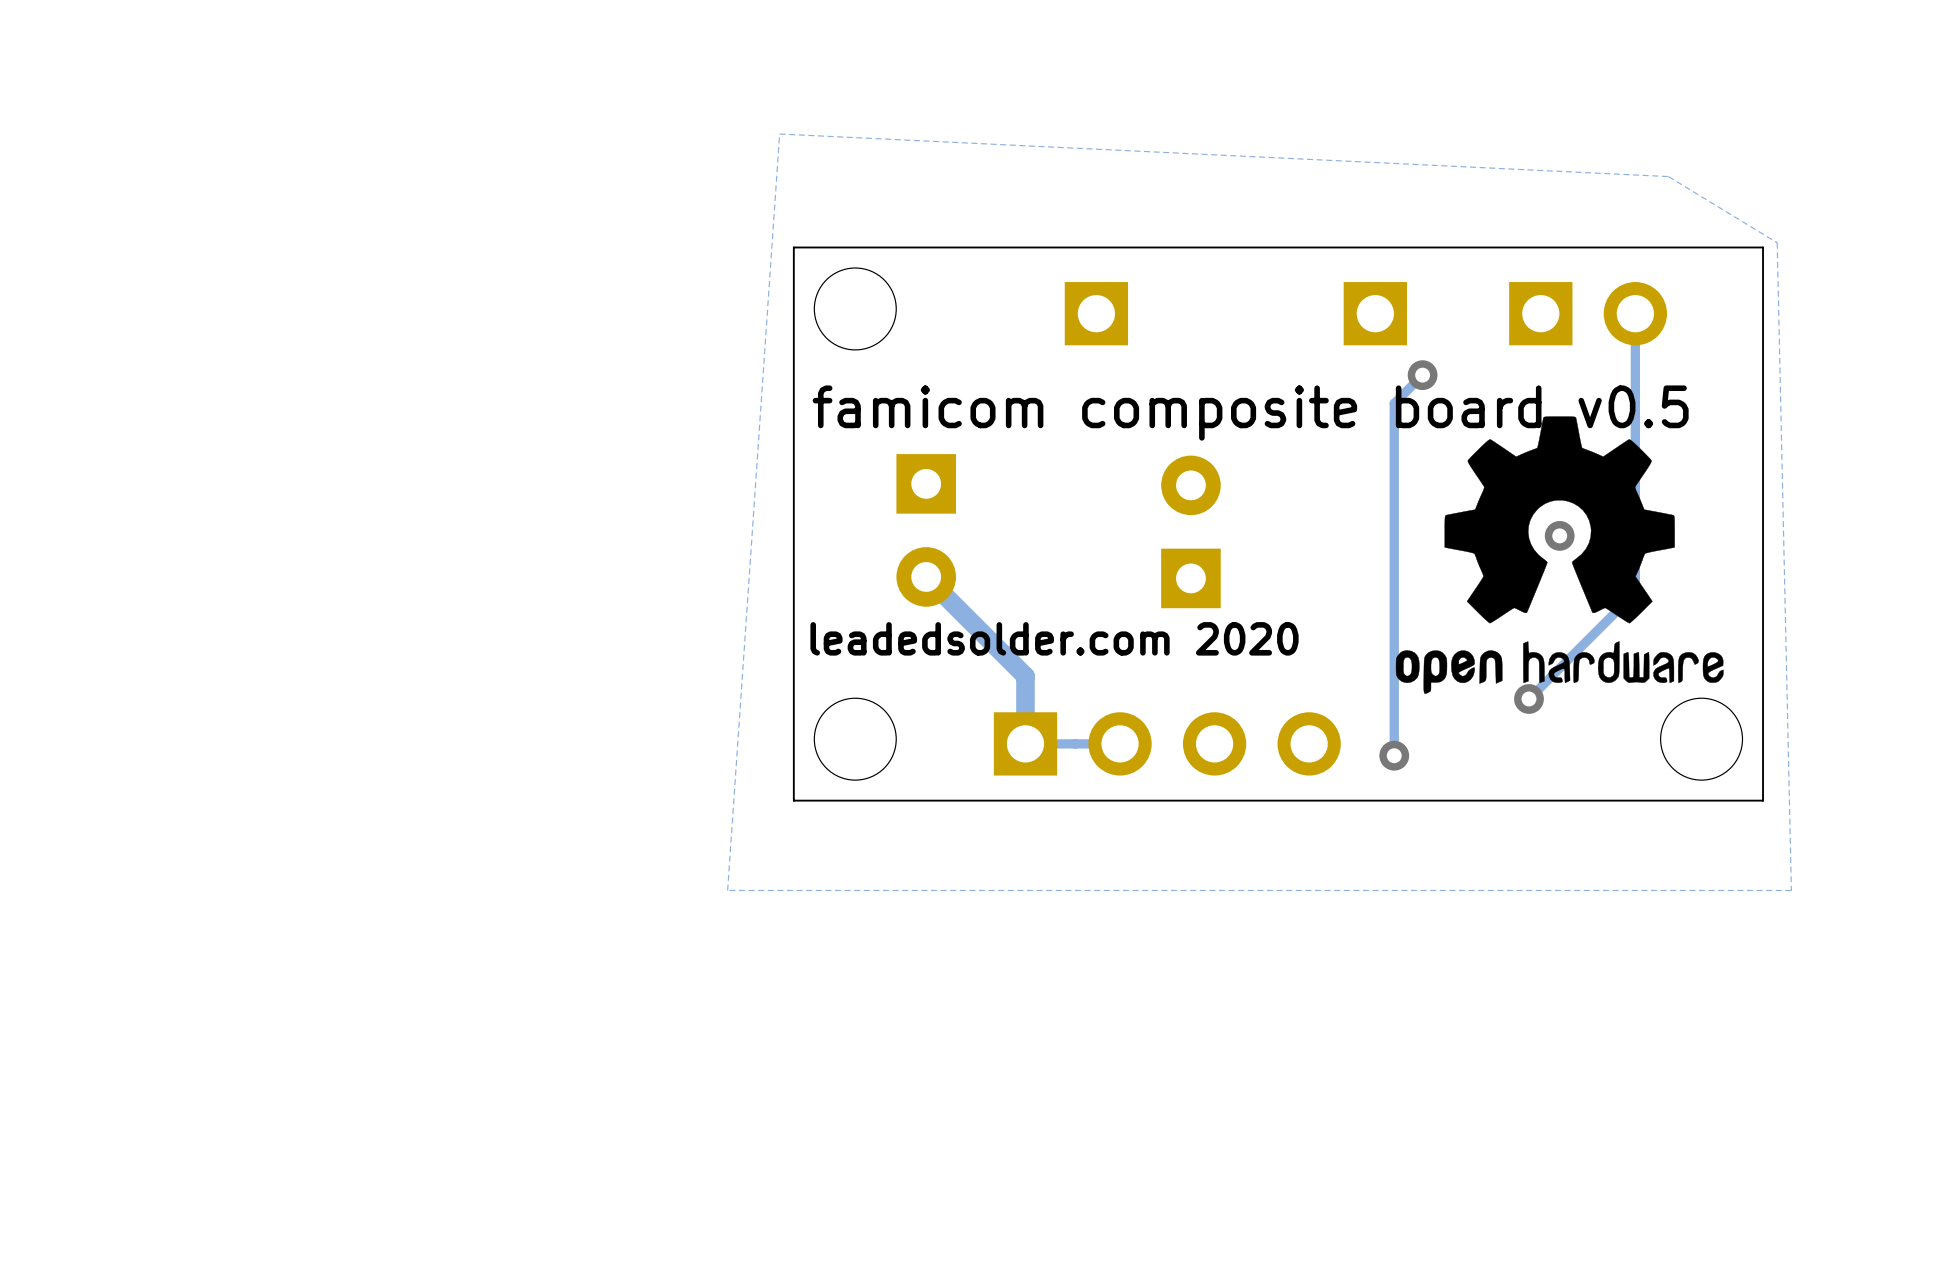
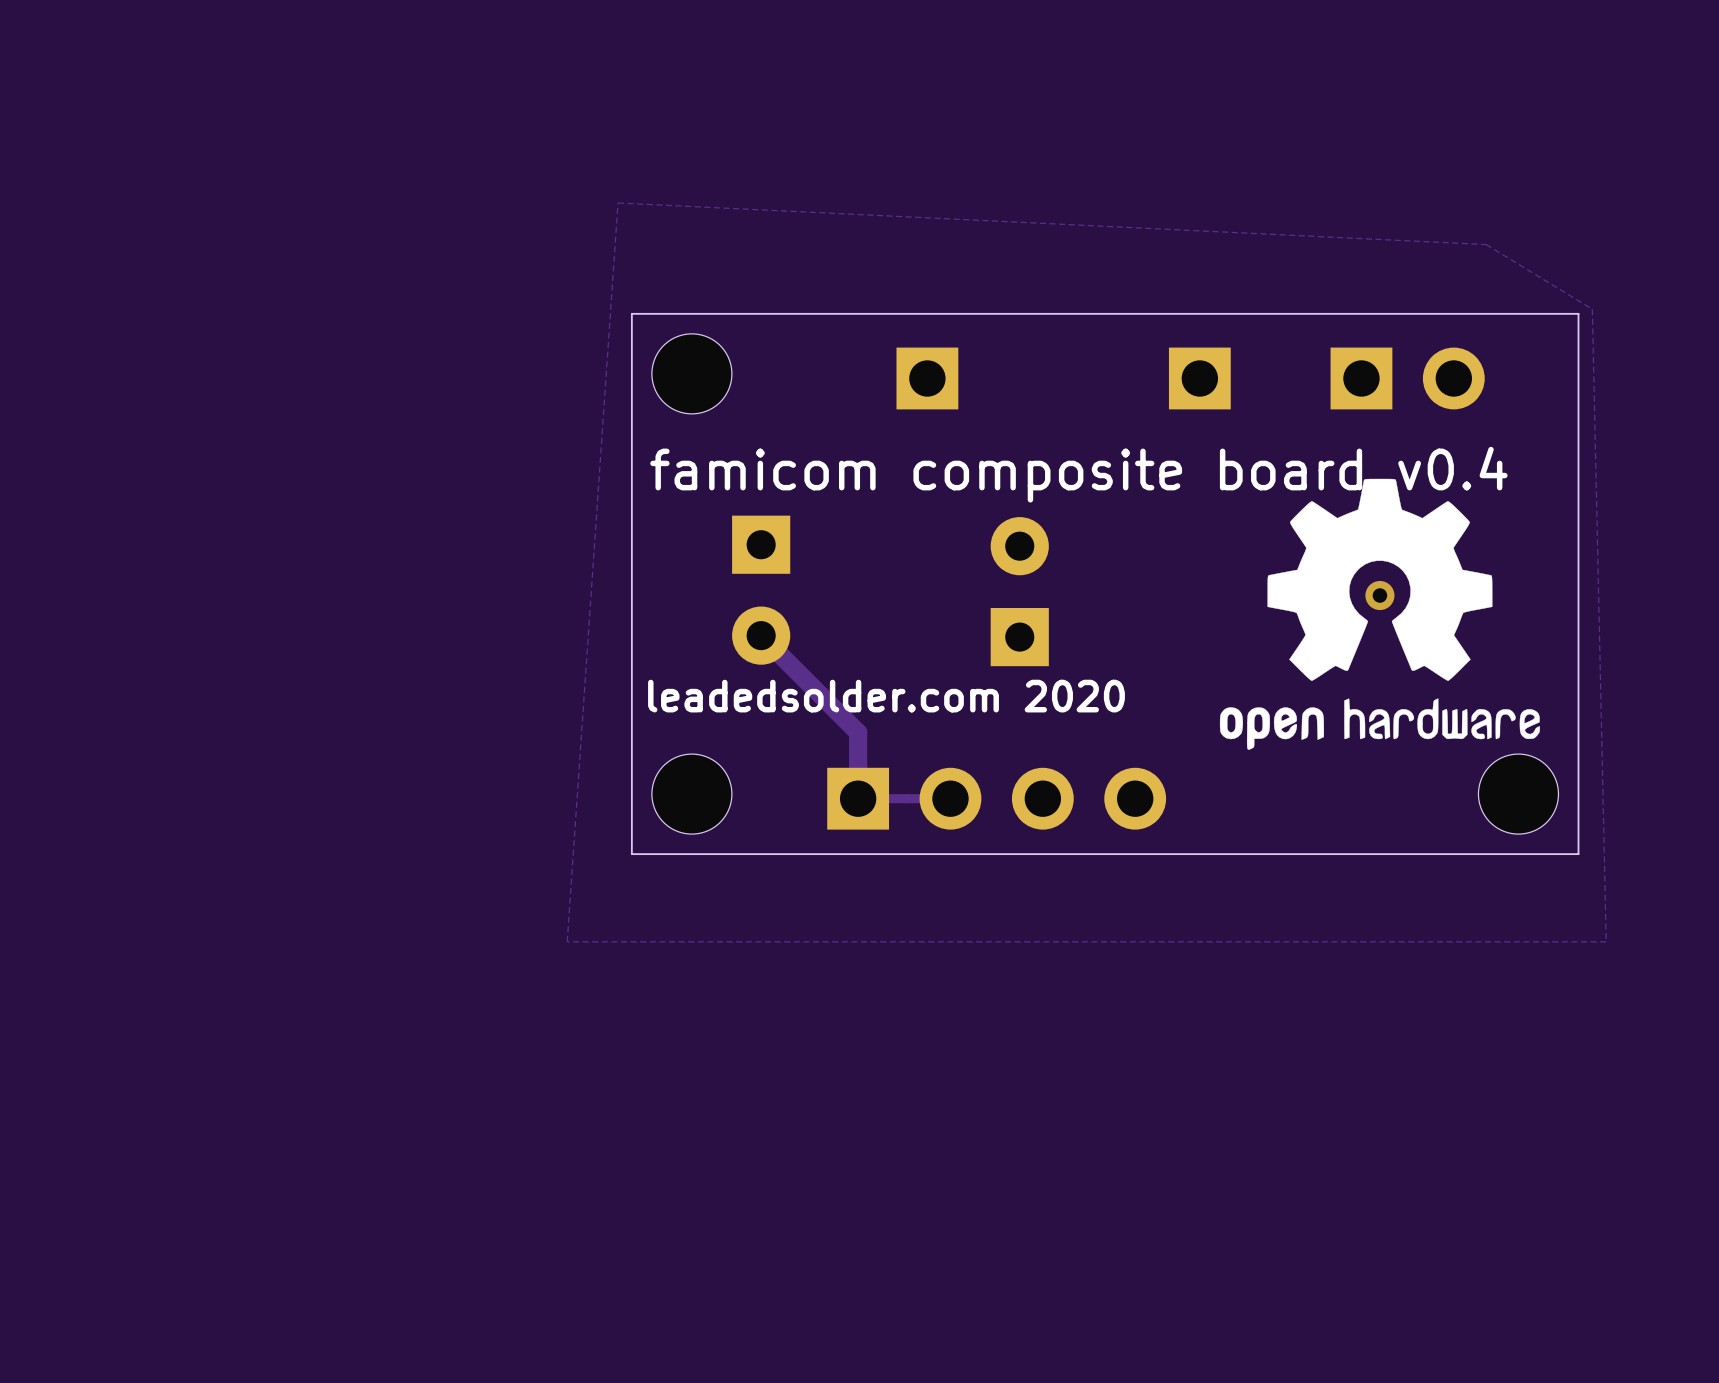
track: (1635, 313) (1635, 592) (1528, 698) -> none
track: (1422, 375) (1394, 403) (1394, 755) -> none
via: (1422, 375) -> none
text: famicom composite board v0.5 (1250, 413) -> famicom composite board v0.4 (1078, 474)
via: (1528, 698) -> none
via: (1394, 755) -> none

